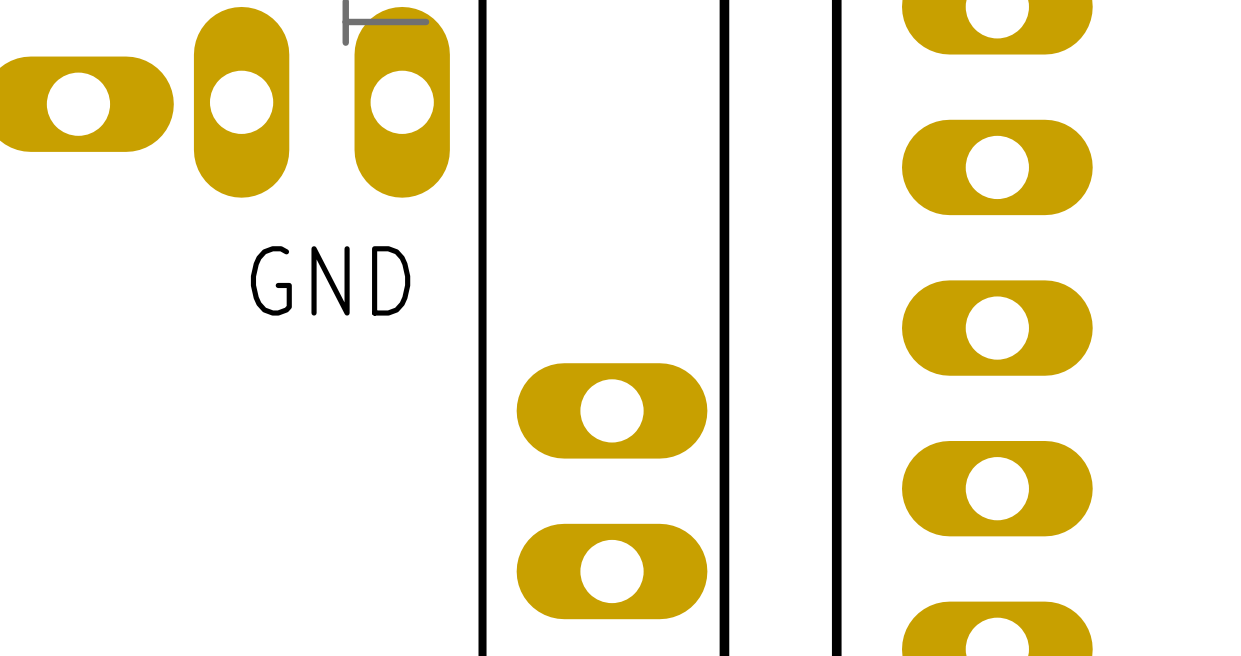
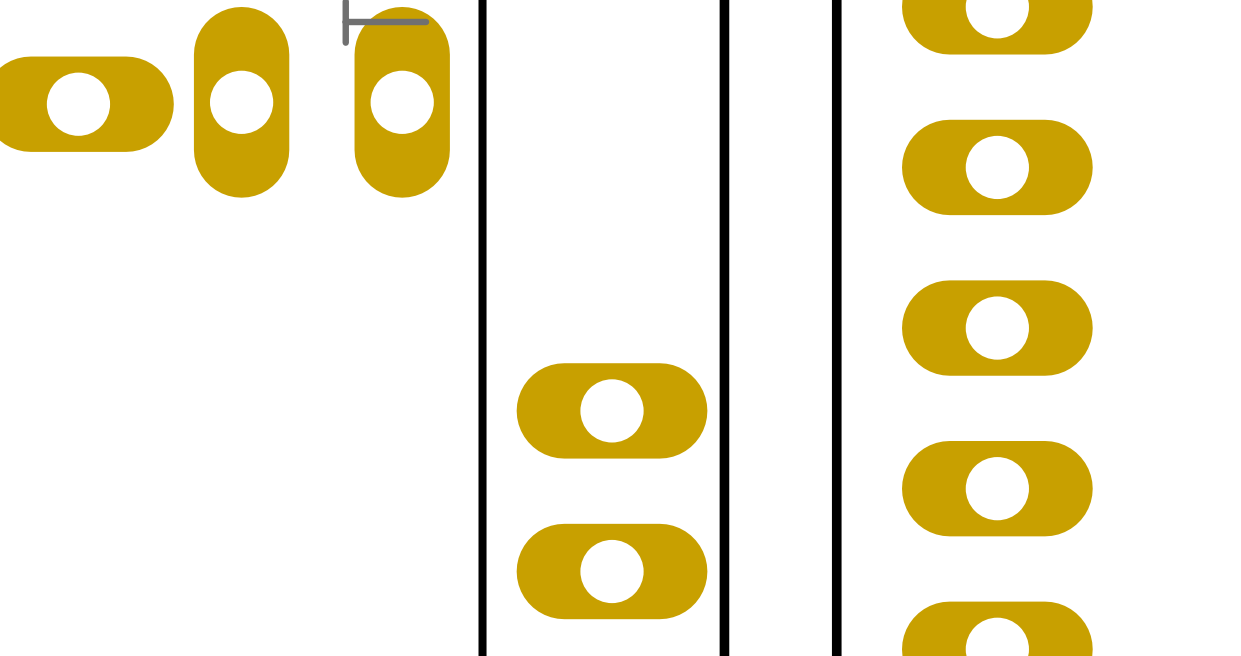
text: GND (330, 280) -> none

